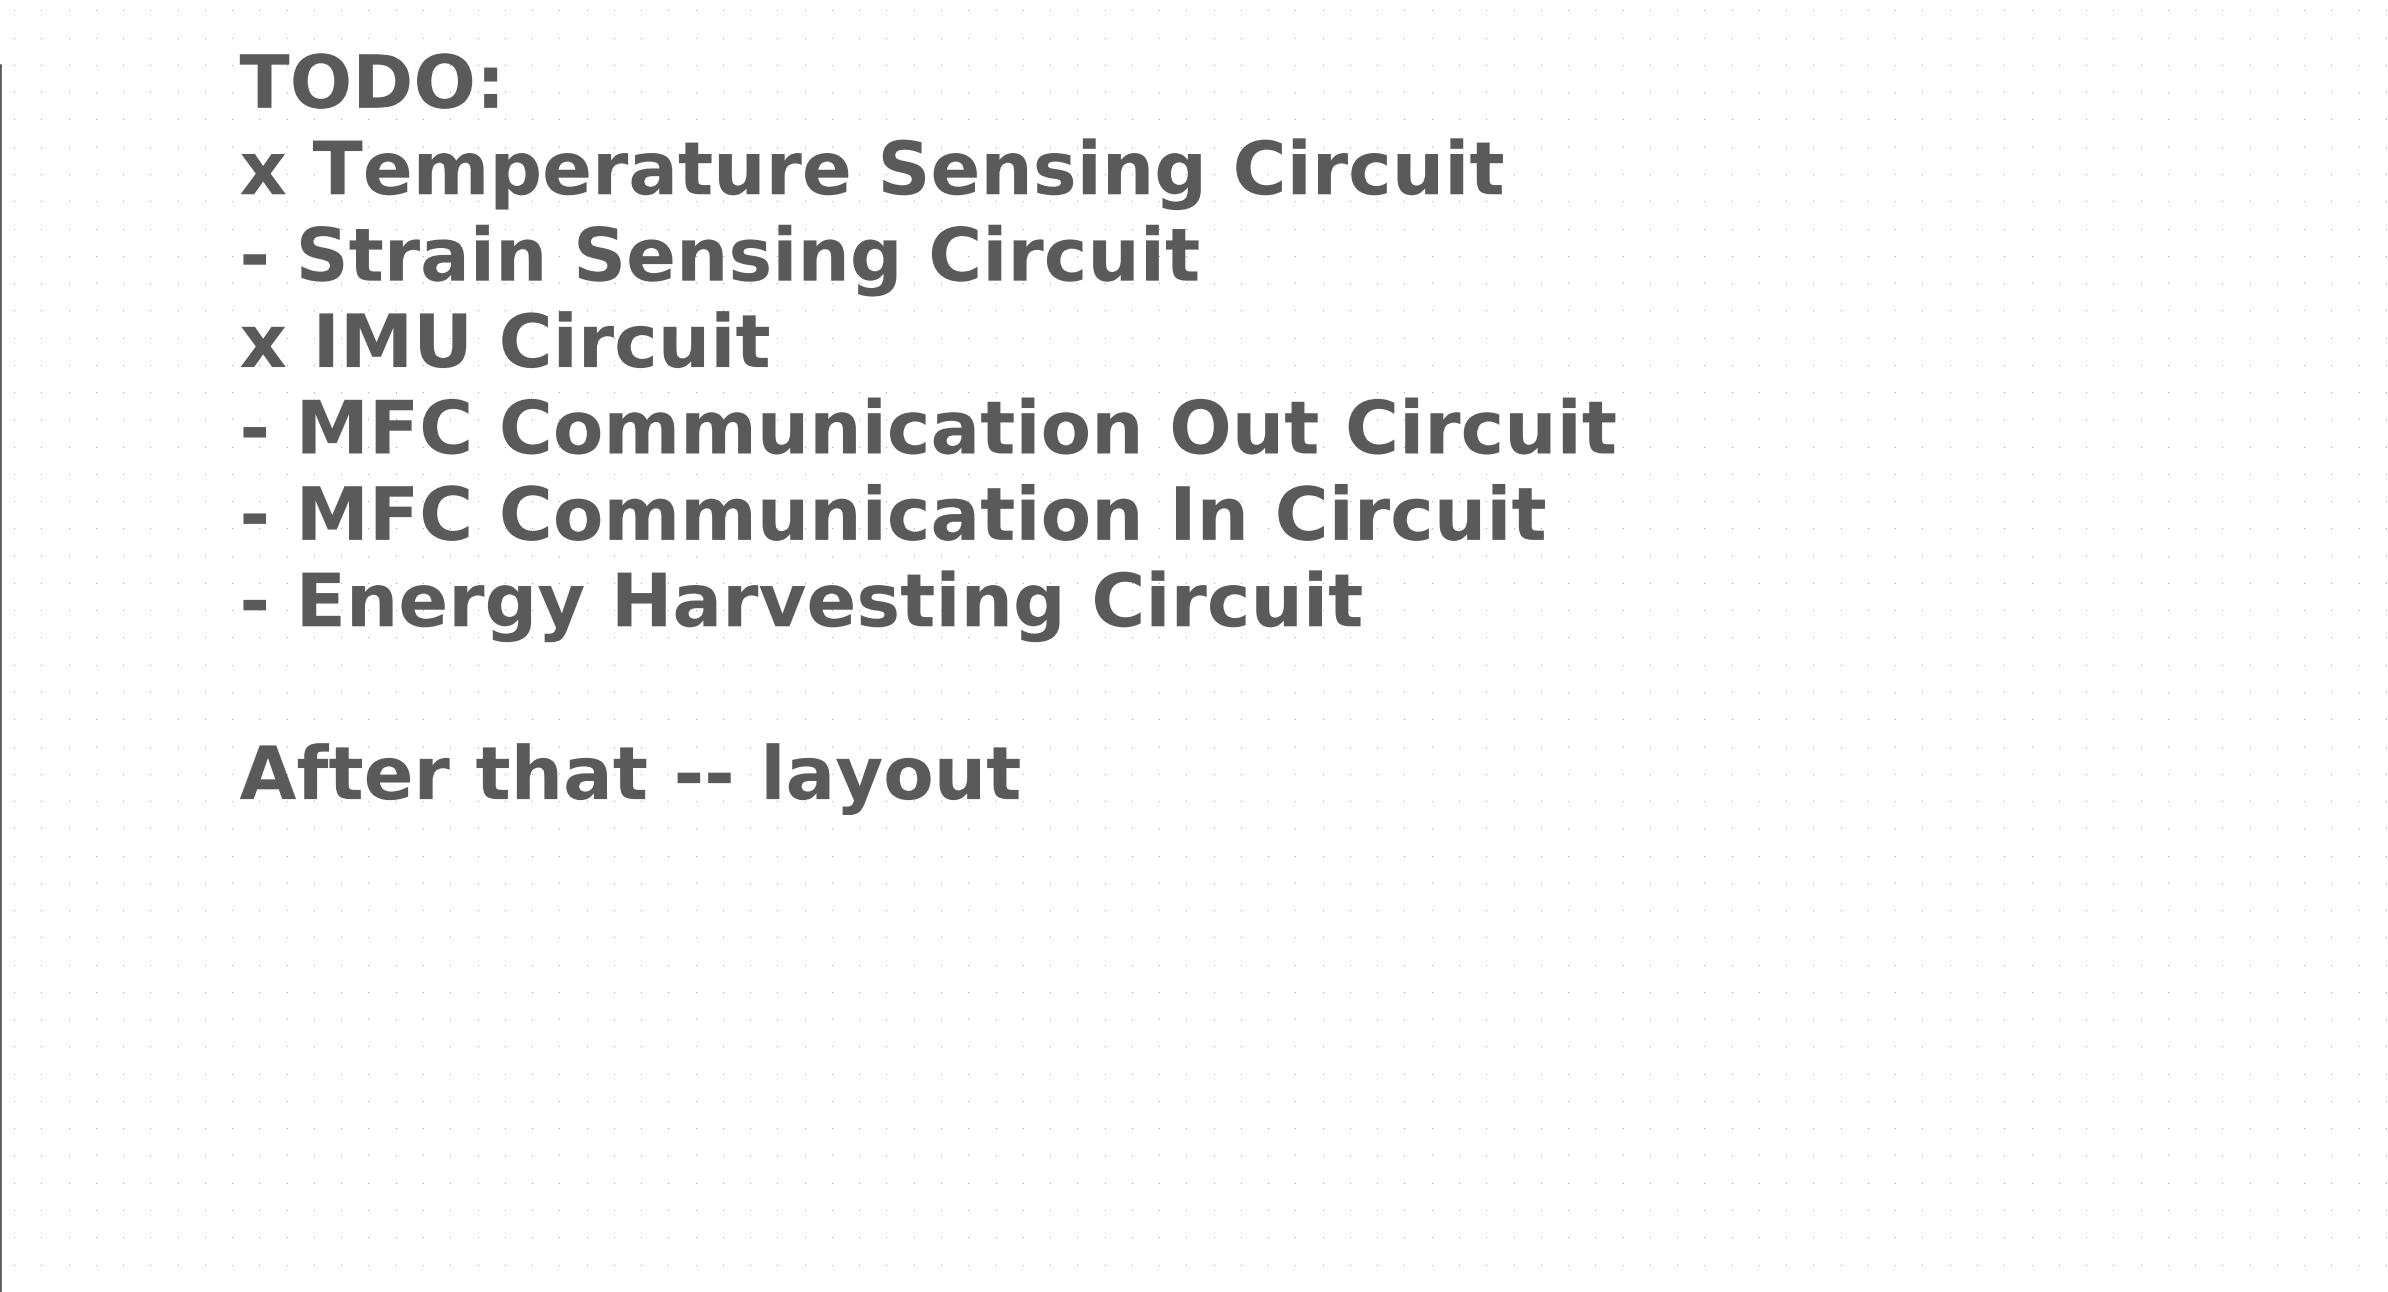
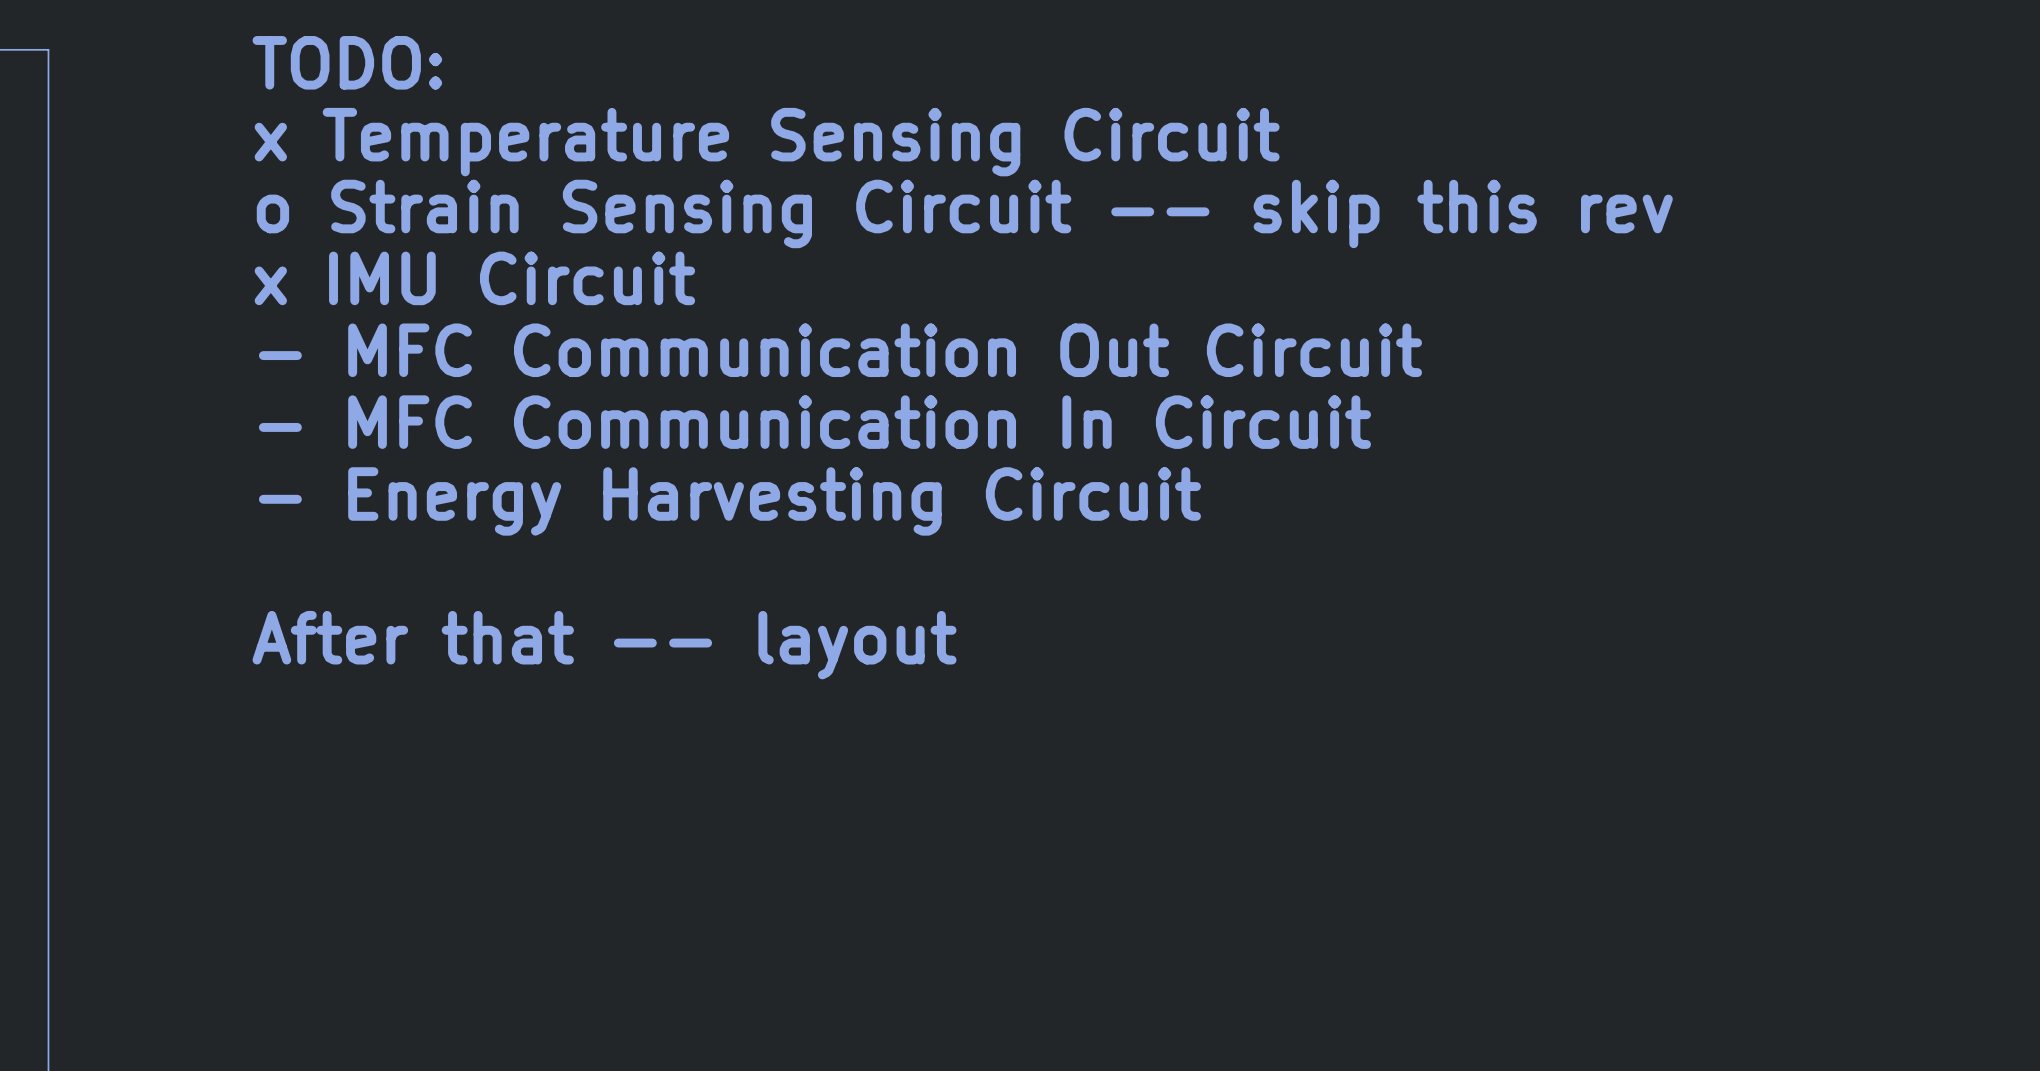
text: - Strain Sensing Circuit (721, 260) -> o Strain Sensing Circuit -- skip this rev (964, 213)

